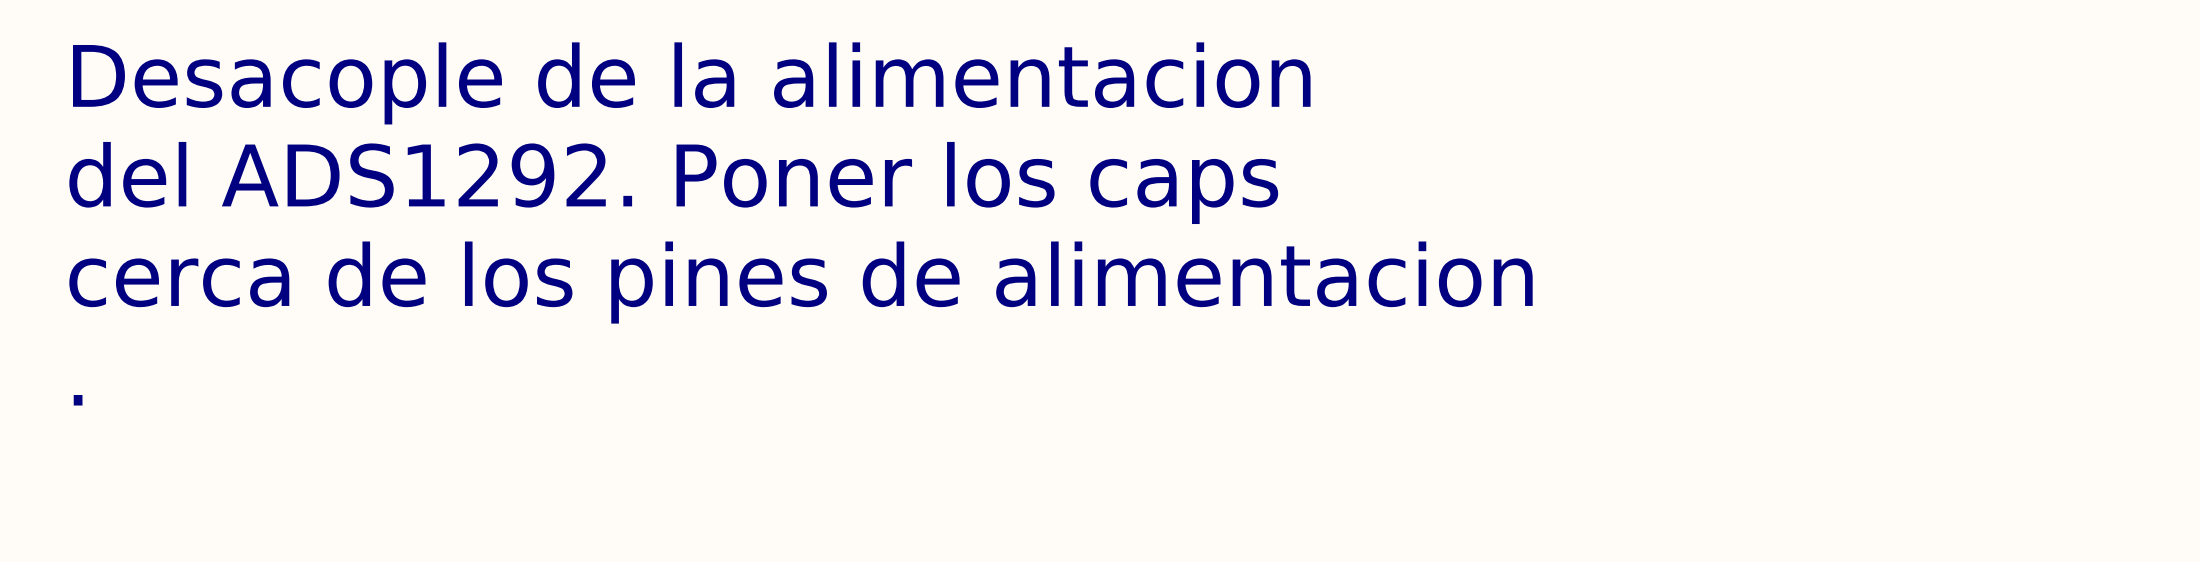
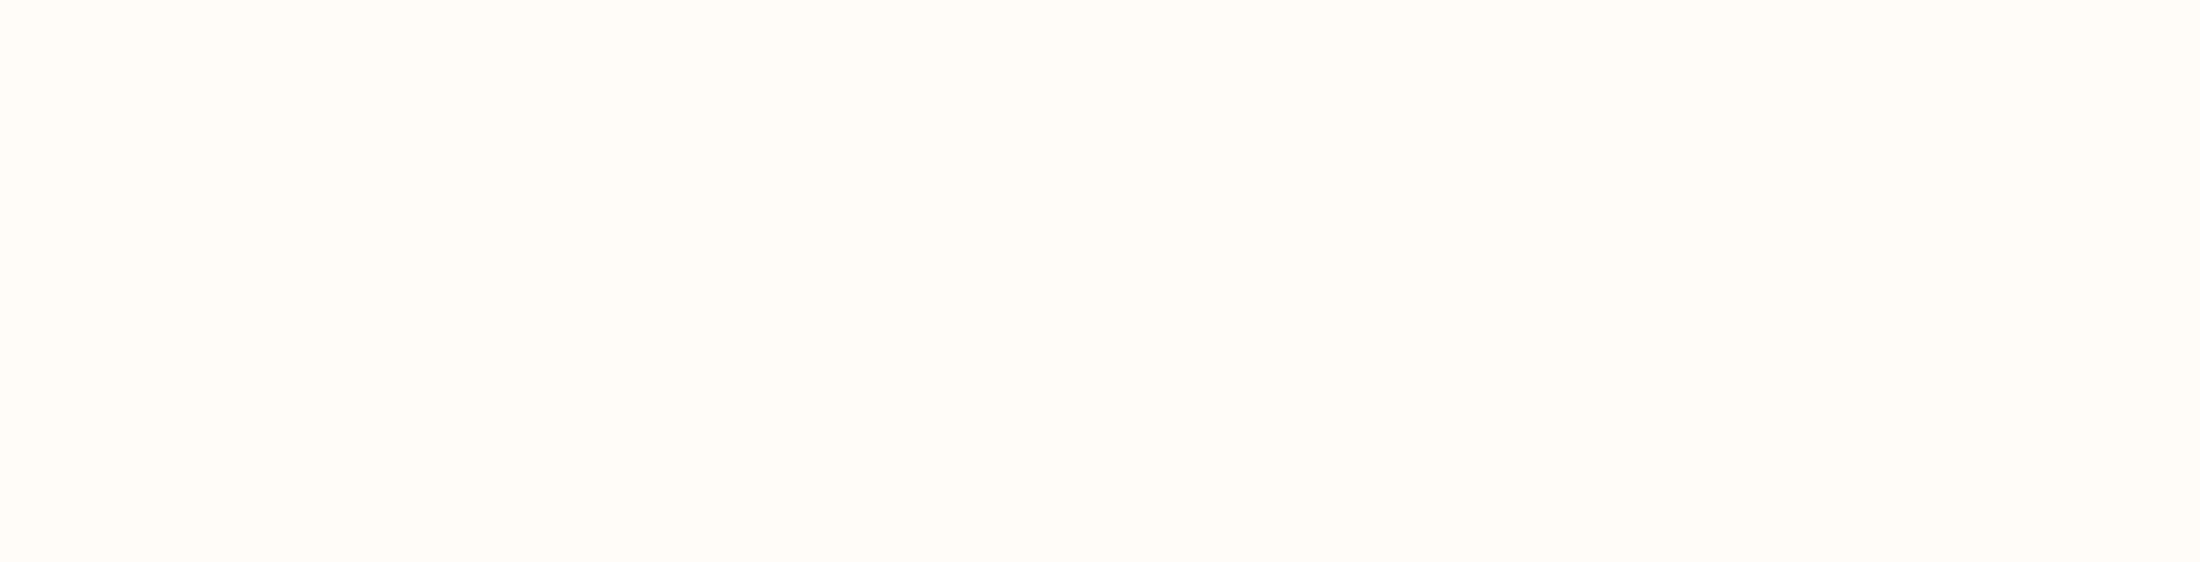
text: Desacople de la alimentacion (691, 83) -> none
text: del ADS1292. Poner los caps (673, 182) -> none
text: cerca de los pines de alimentacion (801, 282) -> none
text: . (78, 400) -> none

